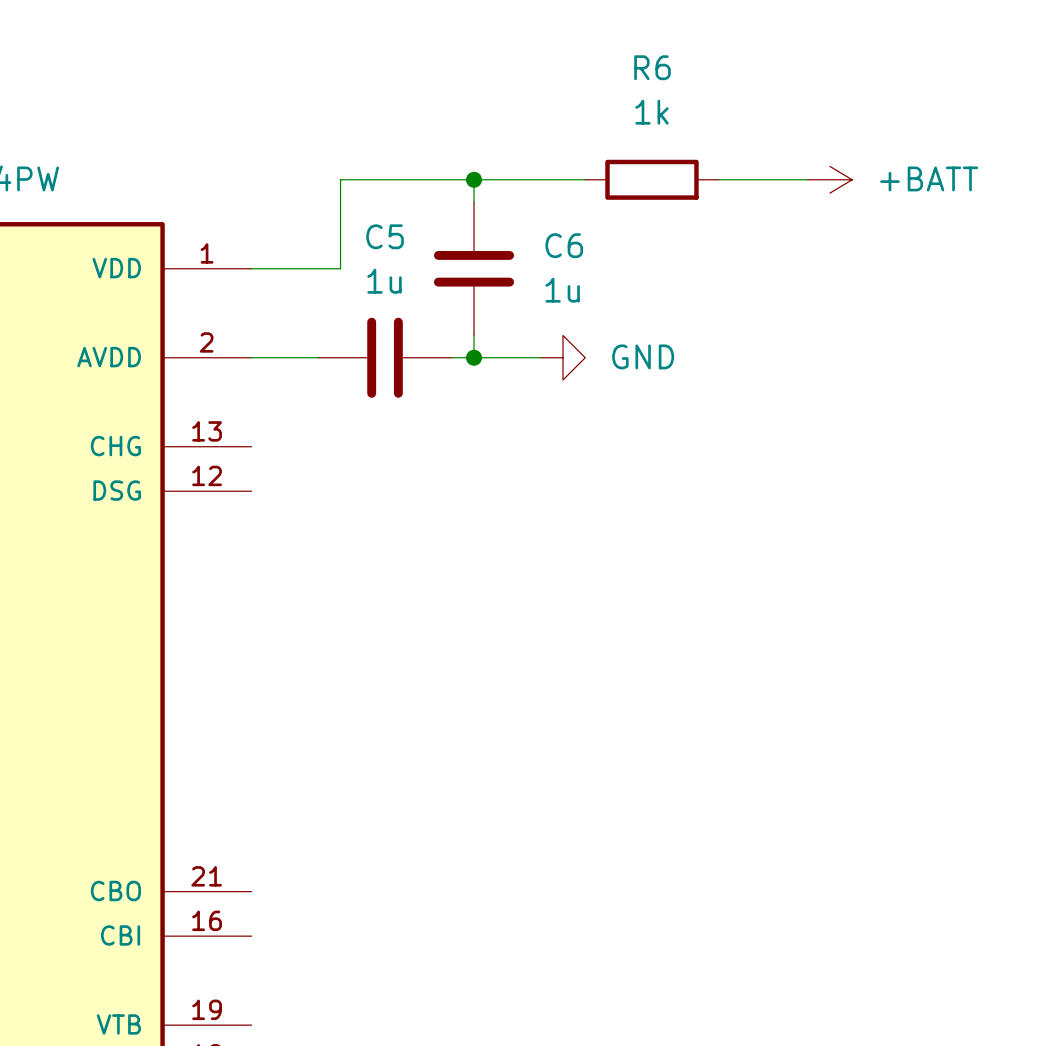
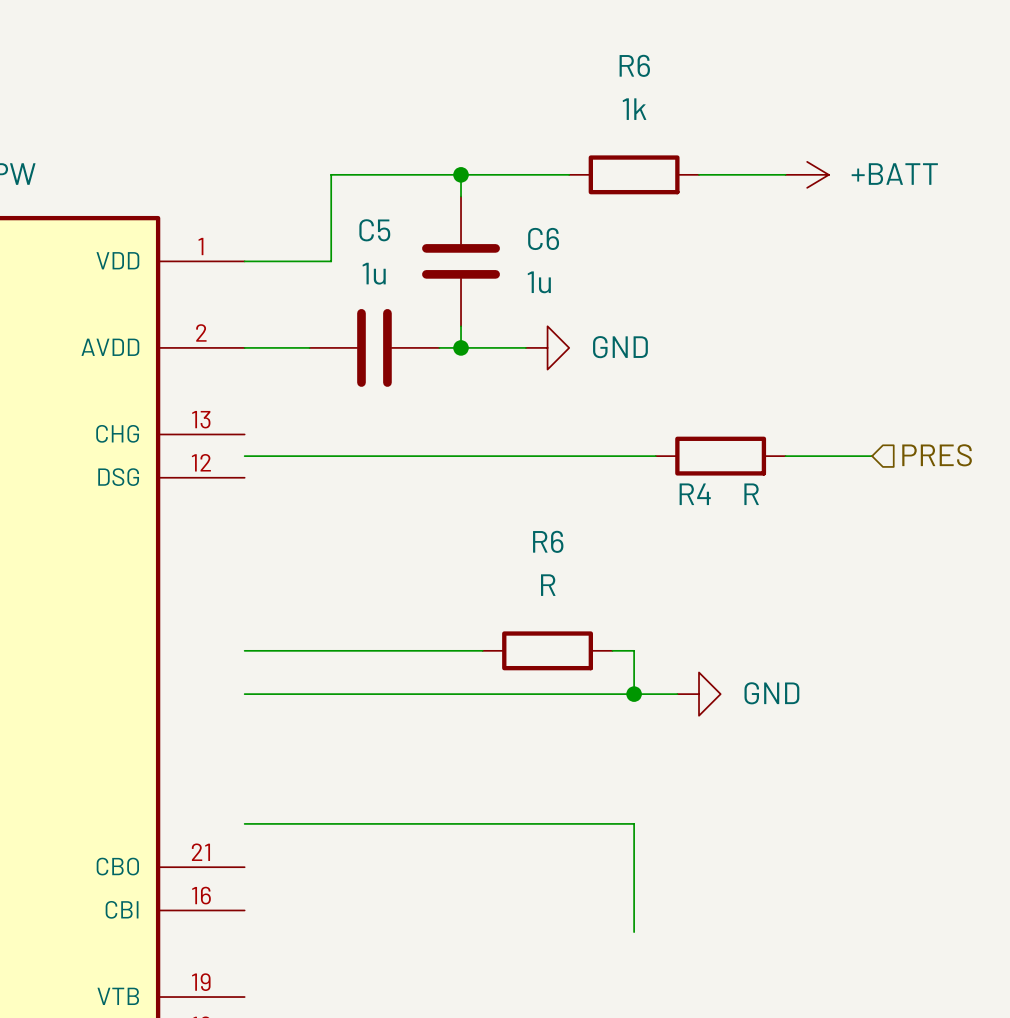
wire: none -> (244, 456) (655, 456)
R4: none -> R (720, 456)
wire: none -> (785, 456) (872, 456)
hierarchical label: none -> PRES (937, 455)
wire: none -> (244, 650) (482, 650)
R6: none -> R (547, 650)
wire: none -> (612, 650) (634, 650) (634, 694)
wire: none -> (244, 694) (677, 694)
junction: none -> (634, 694)
power symbol: none -> GND (699, 694)
wire: none -> (244, 823) (634, 823) (634, 932)

